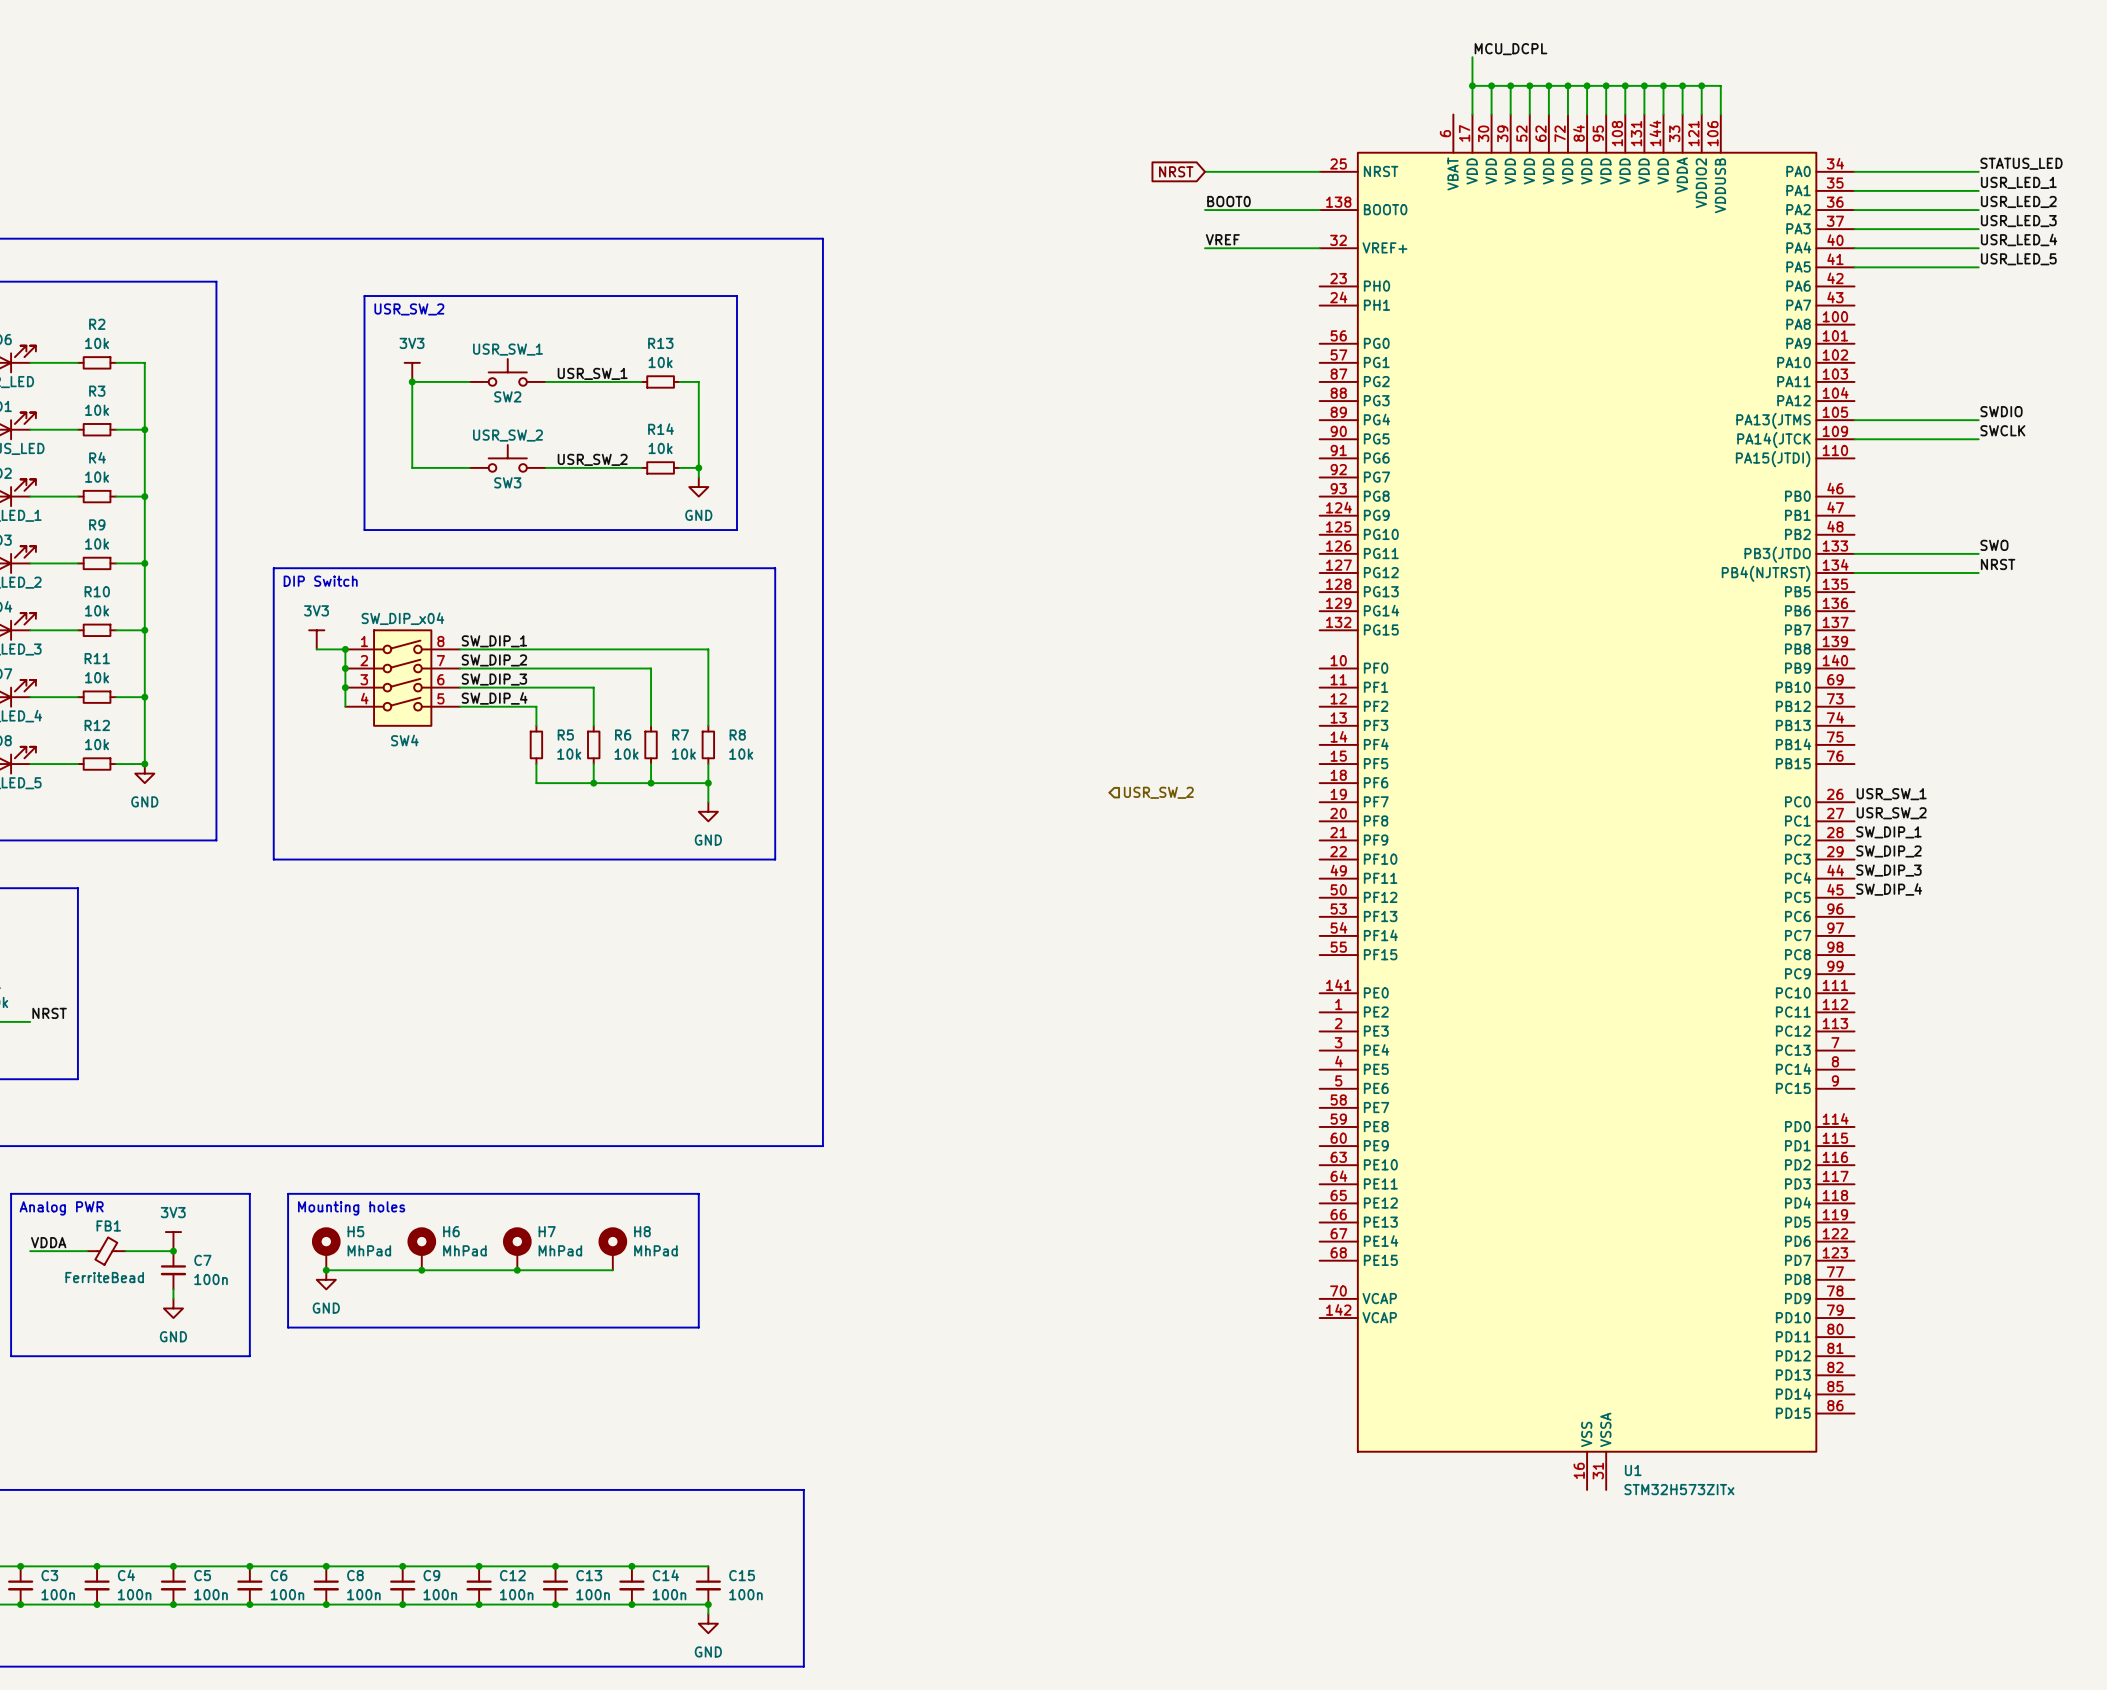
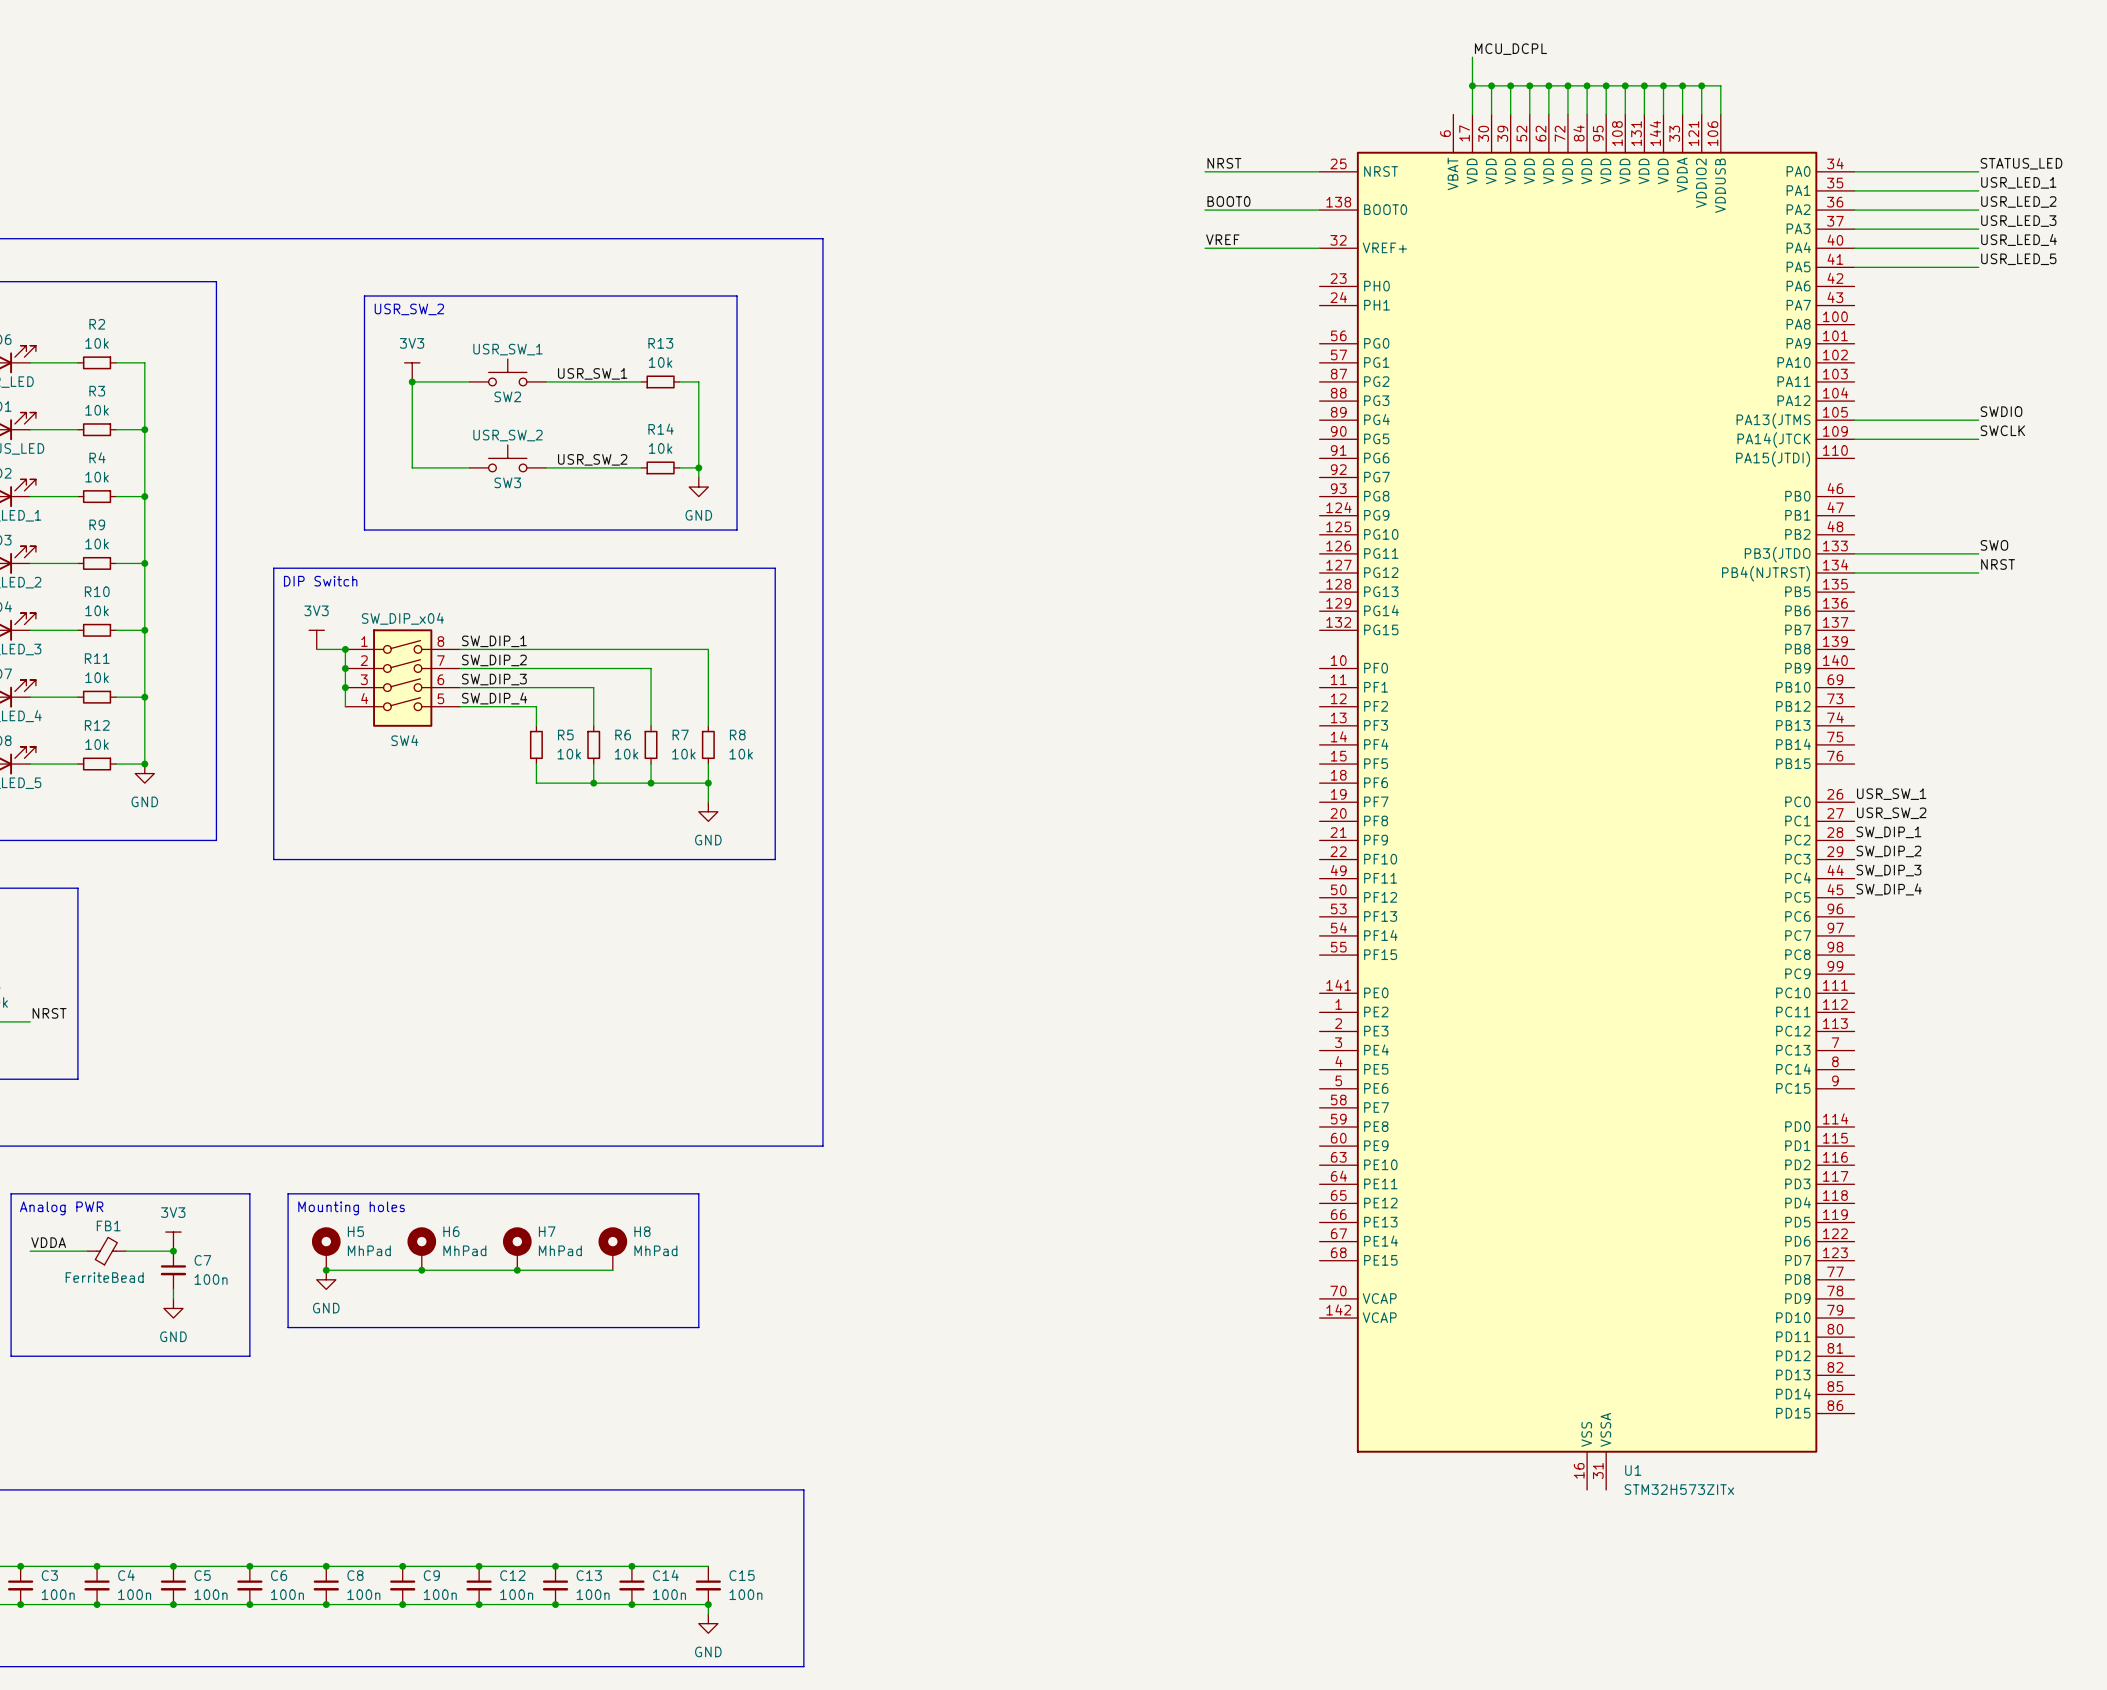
label: none -> NRST (1224, 163)
global label: NRST (1176, 171) -> none
hierarchical label: USR_SW_2 (1158, 792) -> none

